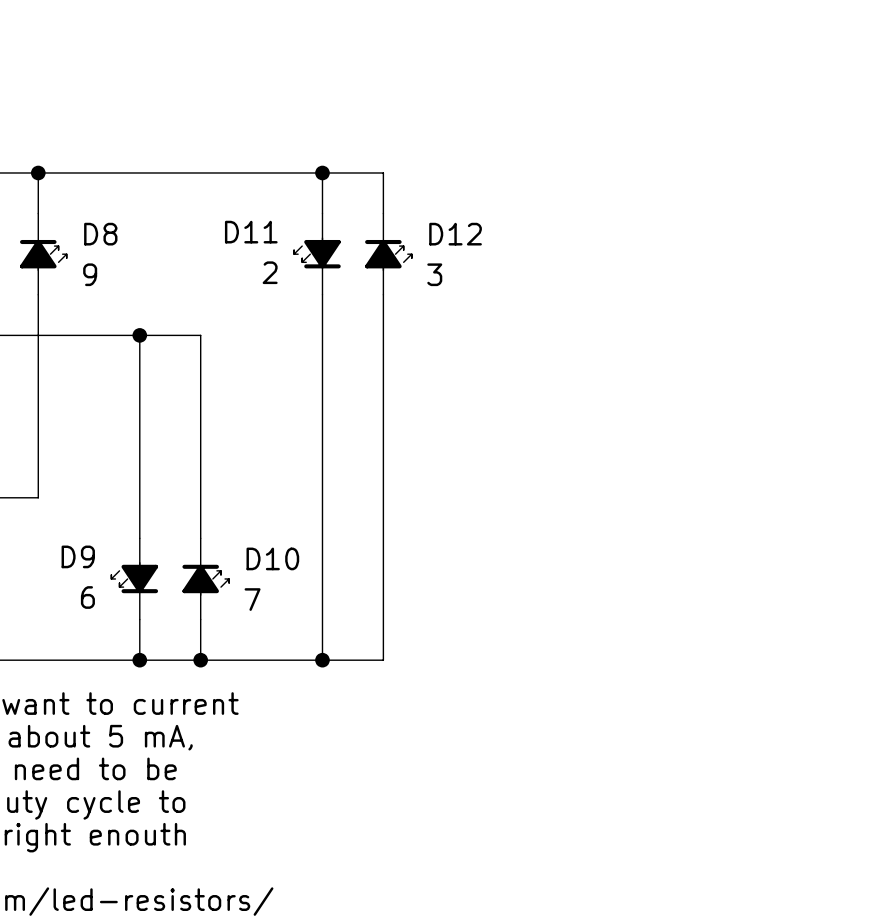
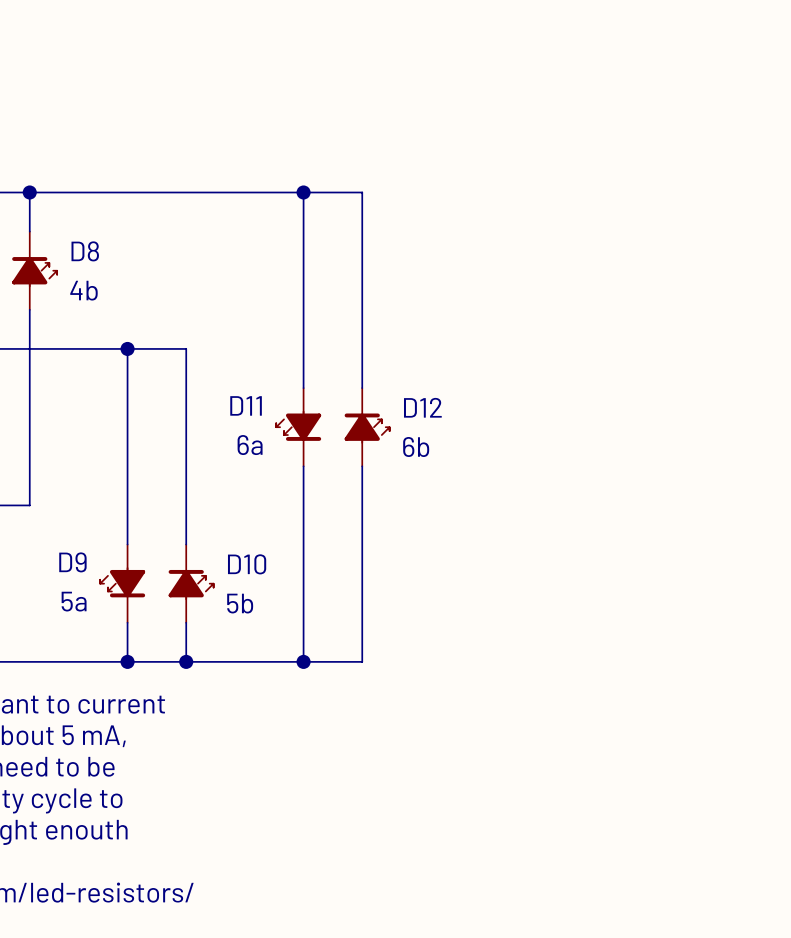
D11 position: (317, 254) -> (298, 427)
D12 position: (388, 254) -> (367, 427)
D11 value: 2 (270, 272) -> 6a (250, 445)
D8 value: 9 (90, 274) -> 4b (83, 290)
D12 value: 3 (434, 274) -> 6b (416, 447)
D9 value: 6 (87, 597) -> 5a (74, 601)
D10 value: 7 (252, 599) -> 5b (240, 603)

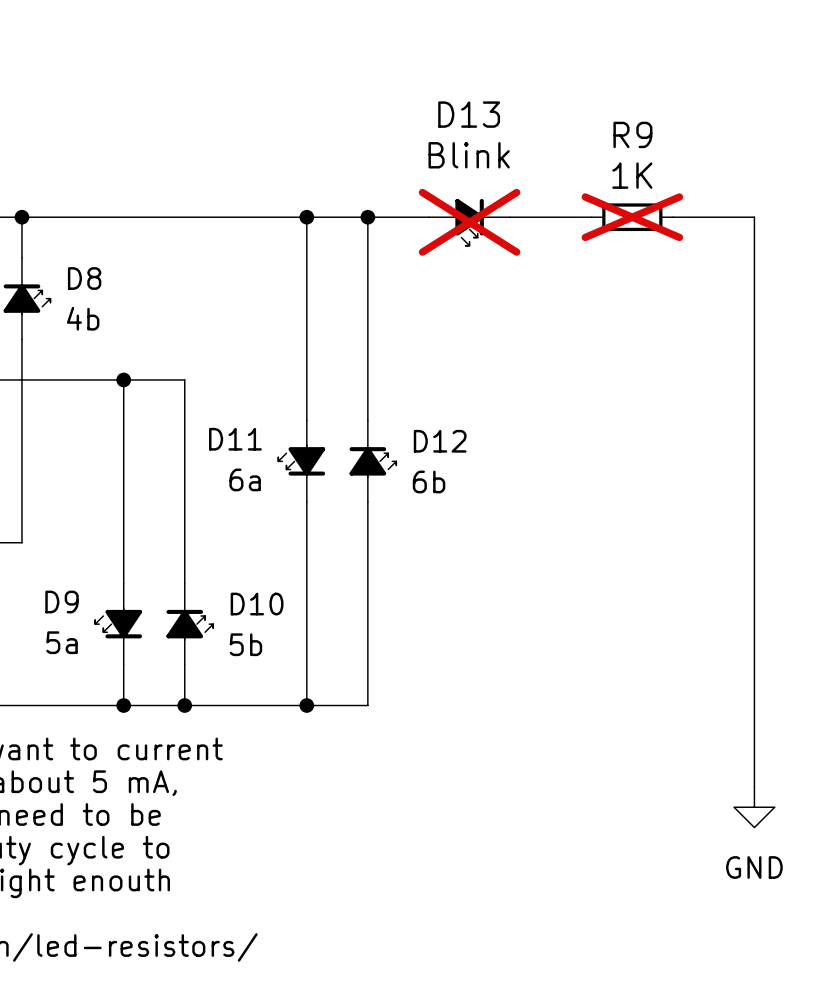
wire: none -> (367, 217) (428, 217)
junction: none -> (367, 217)
wire: none -> (510, 217) (591, 217)
R9: none -> 1K (632, 217)
wire: none -> (673, 217) (754, 217) (754, 786)
D13: none -> Blink (469, 222)
power symbol: none -> GND (754, 807)

